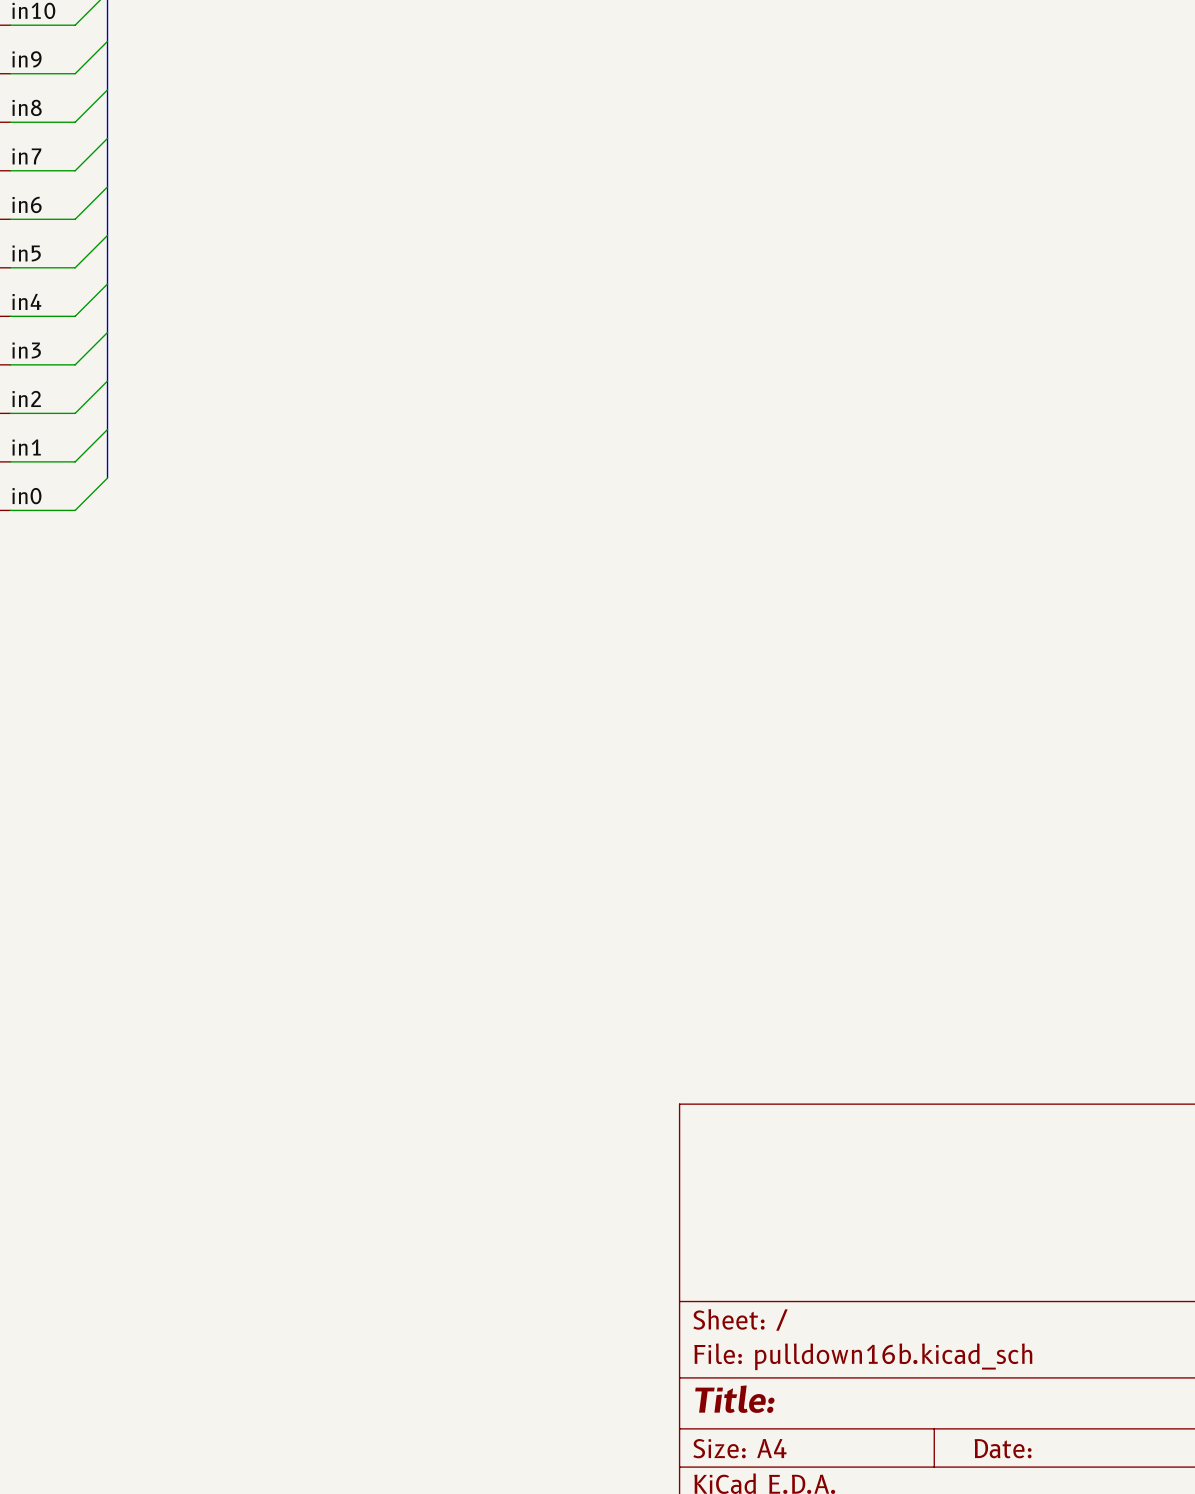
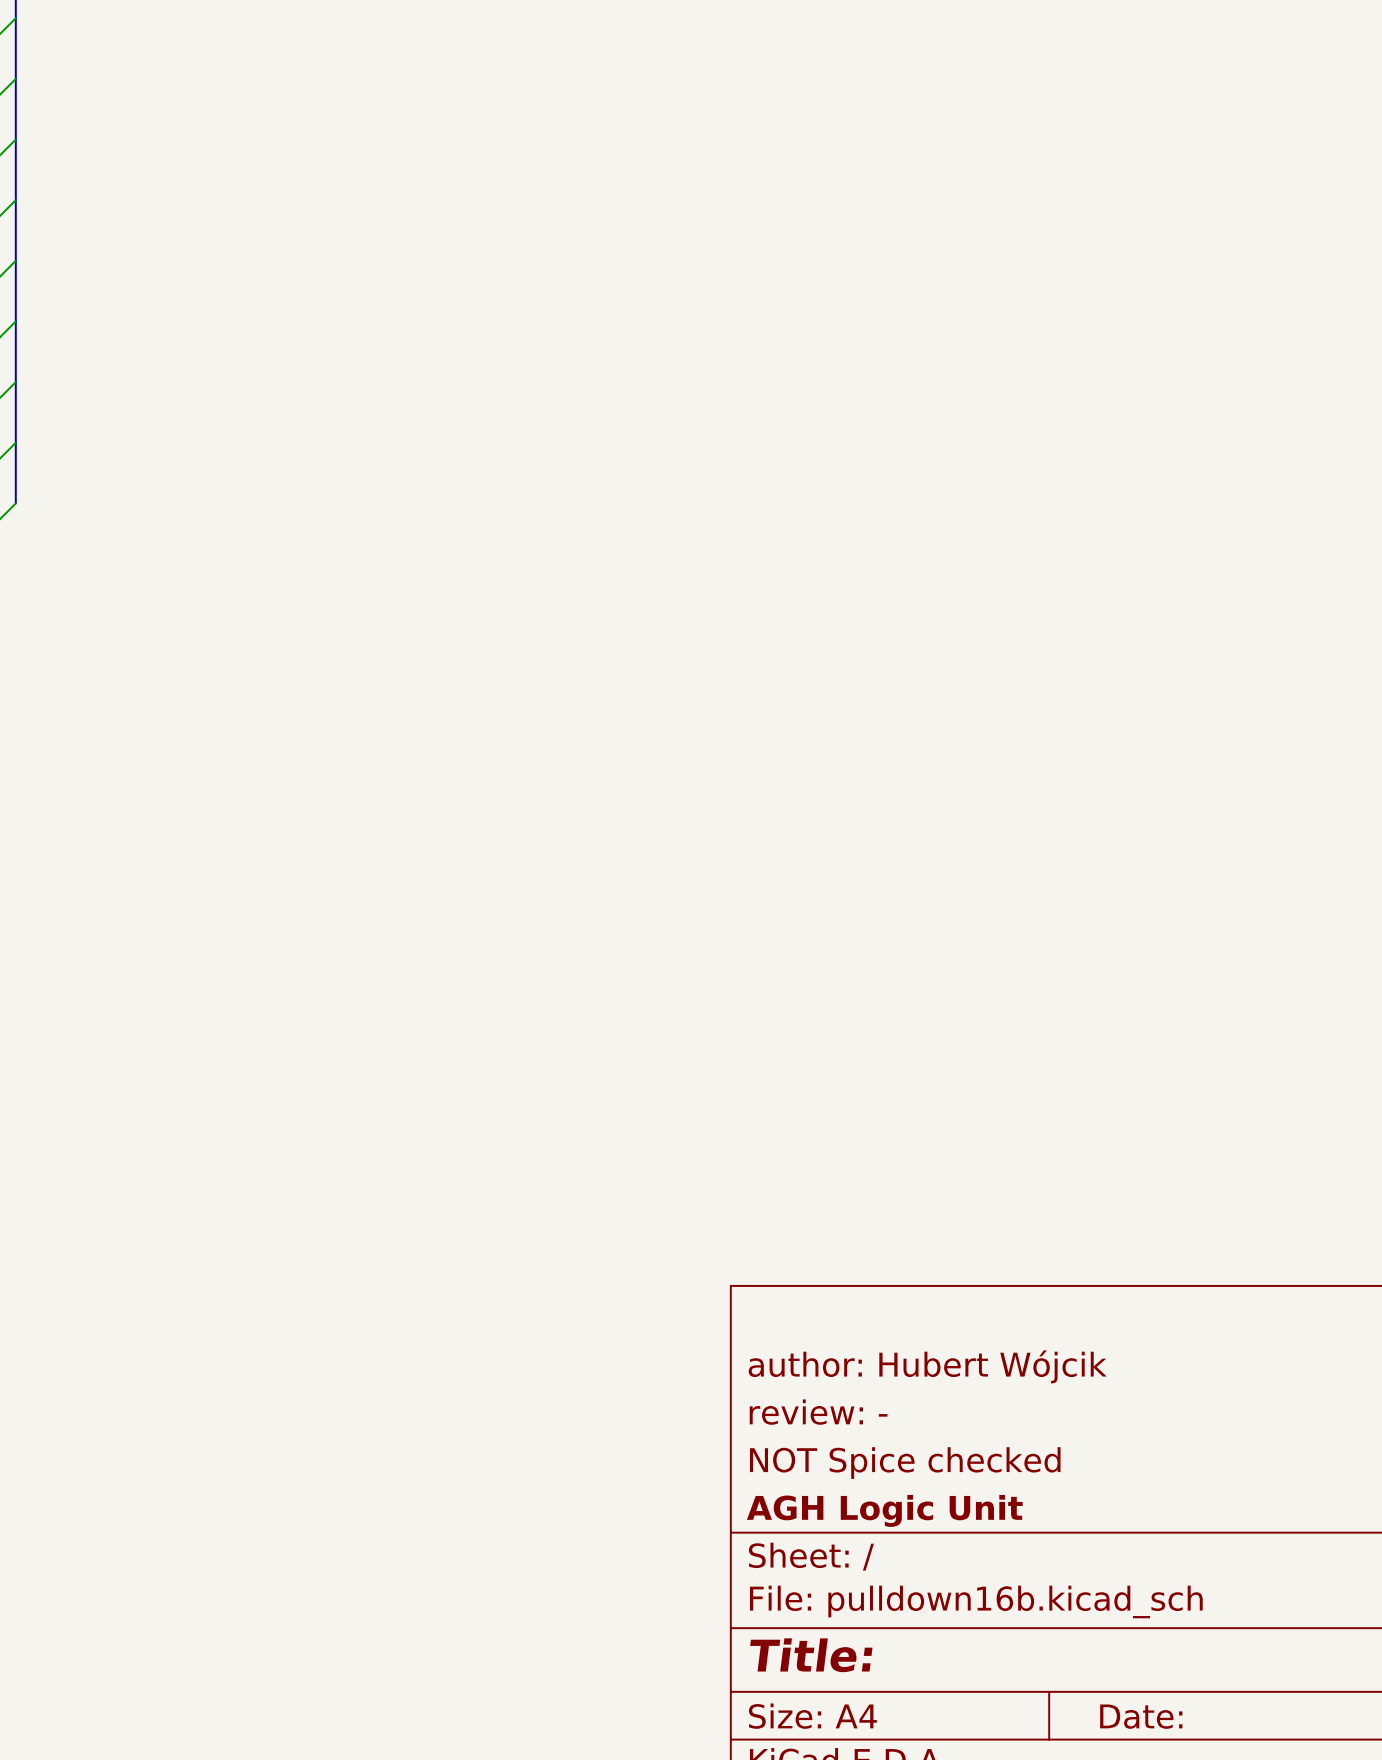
title block: none -> author: Hubert Wójcik (927, 1366)
title block: none -> review: - (818, 1412)
title block: none -> NOT Spice checked (905, 1463)
title block: none -> AGH Logic Unit (884, 1510)

